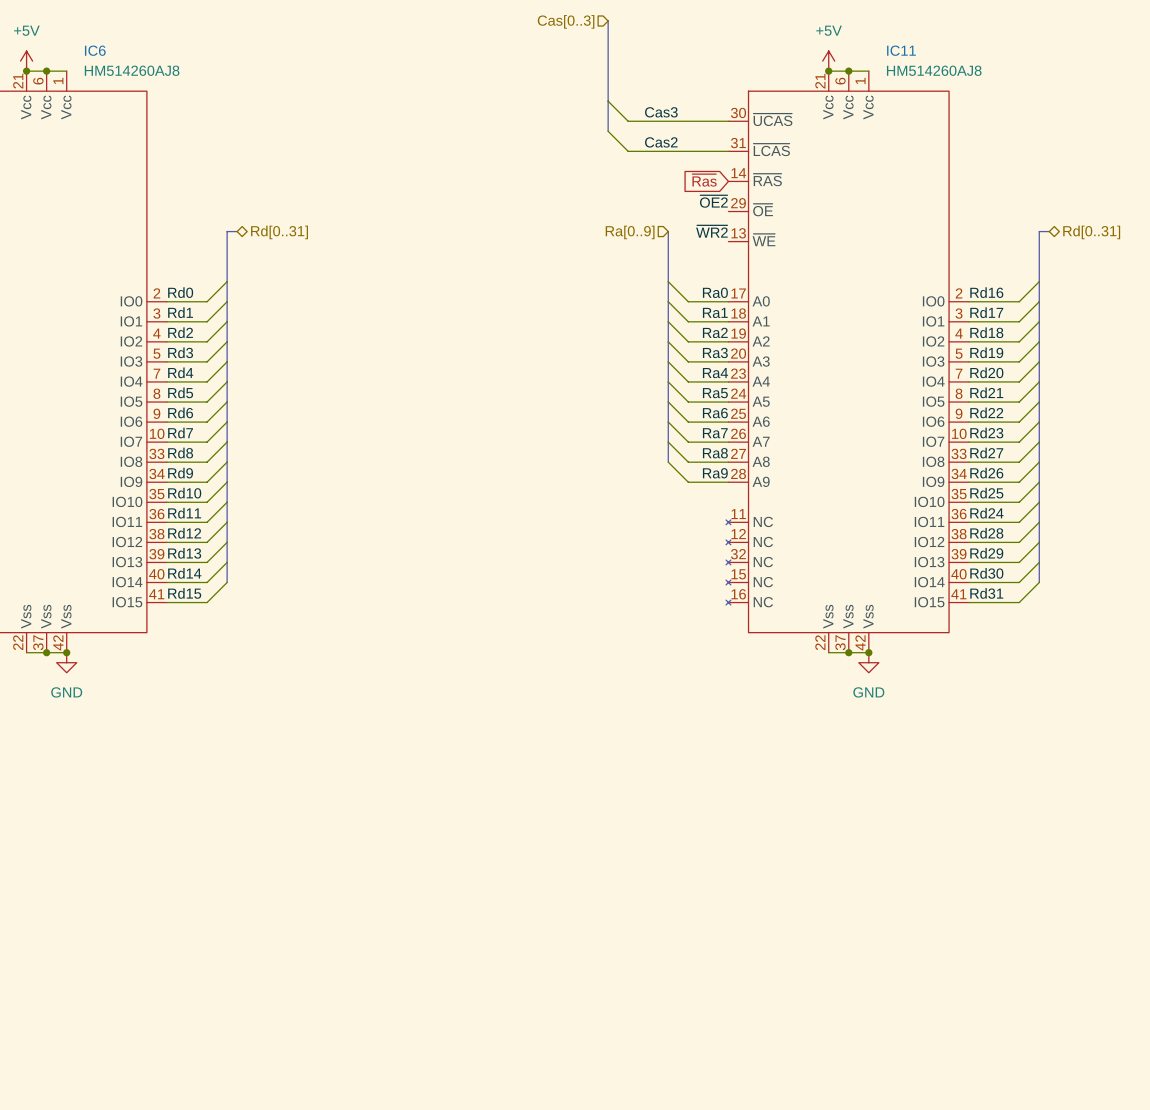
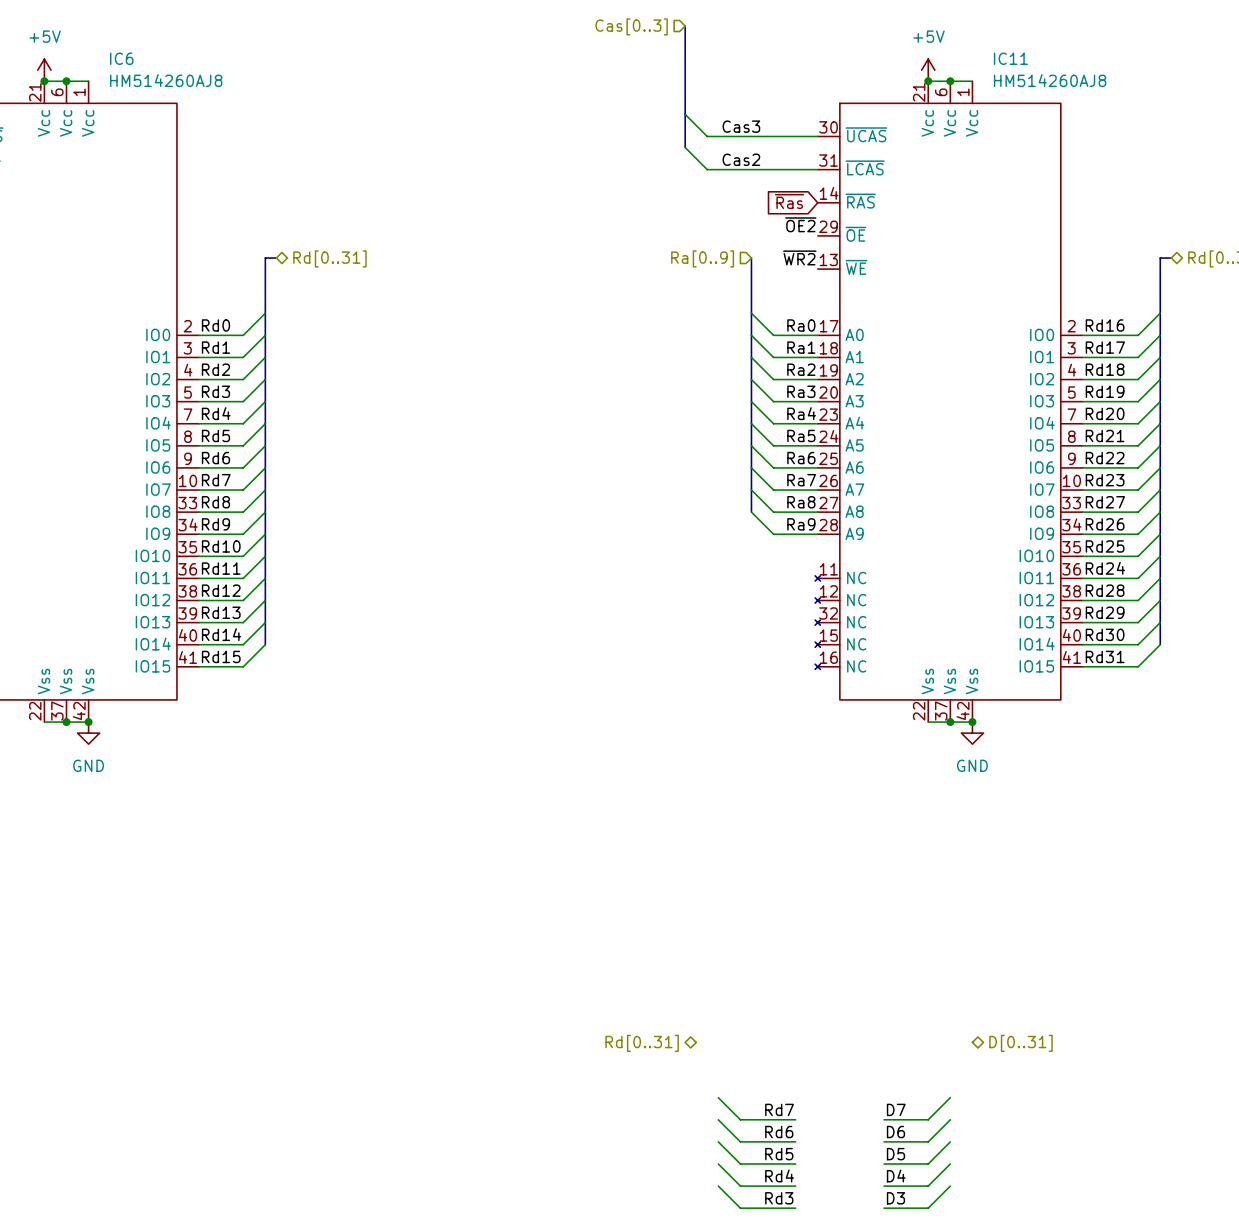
hierarchical label: none -> Rd[0..31] (642, 1043)
hierarchical label: none -> D[0..31] (1021, 1043)
wire: none -> (718, 1097) (740, 1119) (795, 1119)
wire: none -> (950, 1097) (928, 1119) (884, 1119)
label: none -> Rd7 (779, 1109)
label: none -> D7 (896, 1109)
wire: none -> (718, 1119) (740, 1141) (795, 1141)
wire: none -> (950, 1119) (928, 1141) (884, 1141)
label: none -> Rd6 (779, 1132)
label: none -> D6 (895, 1132)
wire: none -> (718, 1141) (740, 1163) (795, 1163)
wire: none -> (950, 1141) (928, 1163) (884, 1163)
label: none -> Rd5 (779, 1154)
label: none -> D5 (895, 1154)
wire: none -> (718, 1163) (740, 1186) (795, 1186)
wire: none -> (950, 1163) (928, 1186) (884, 1186)
label: none -> Rd4 (779, 1175)
label: none -> D4 (896, 1175)
wire: none -> (718, 1186) (740, 1208) (795, 1208)
wire: none -> (950, 1186) (928, 1208) (884, 1208)
label: none -> Rd3 (779, 1198)
label: none -> D3 (895, 1198)

